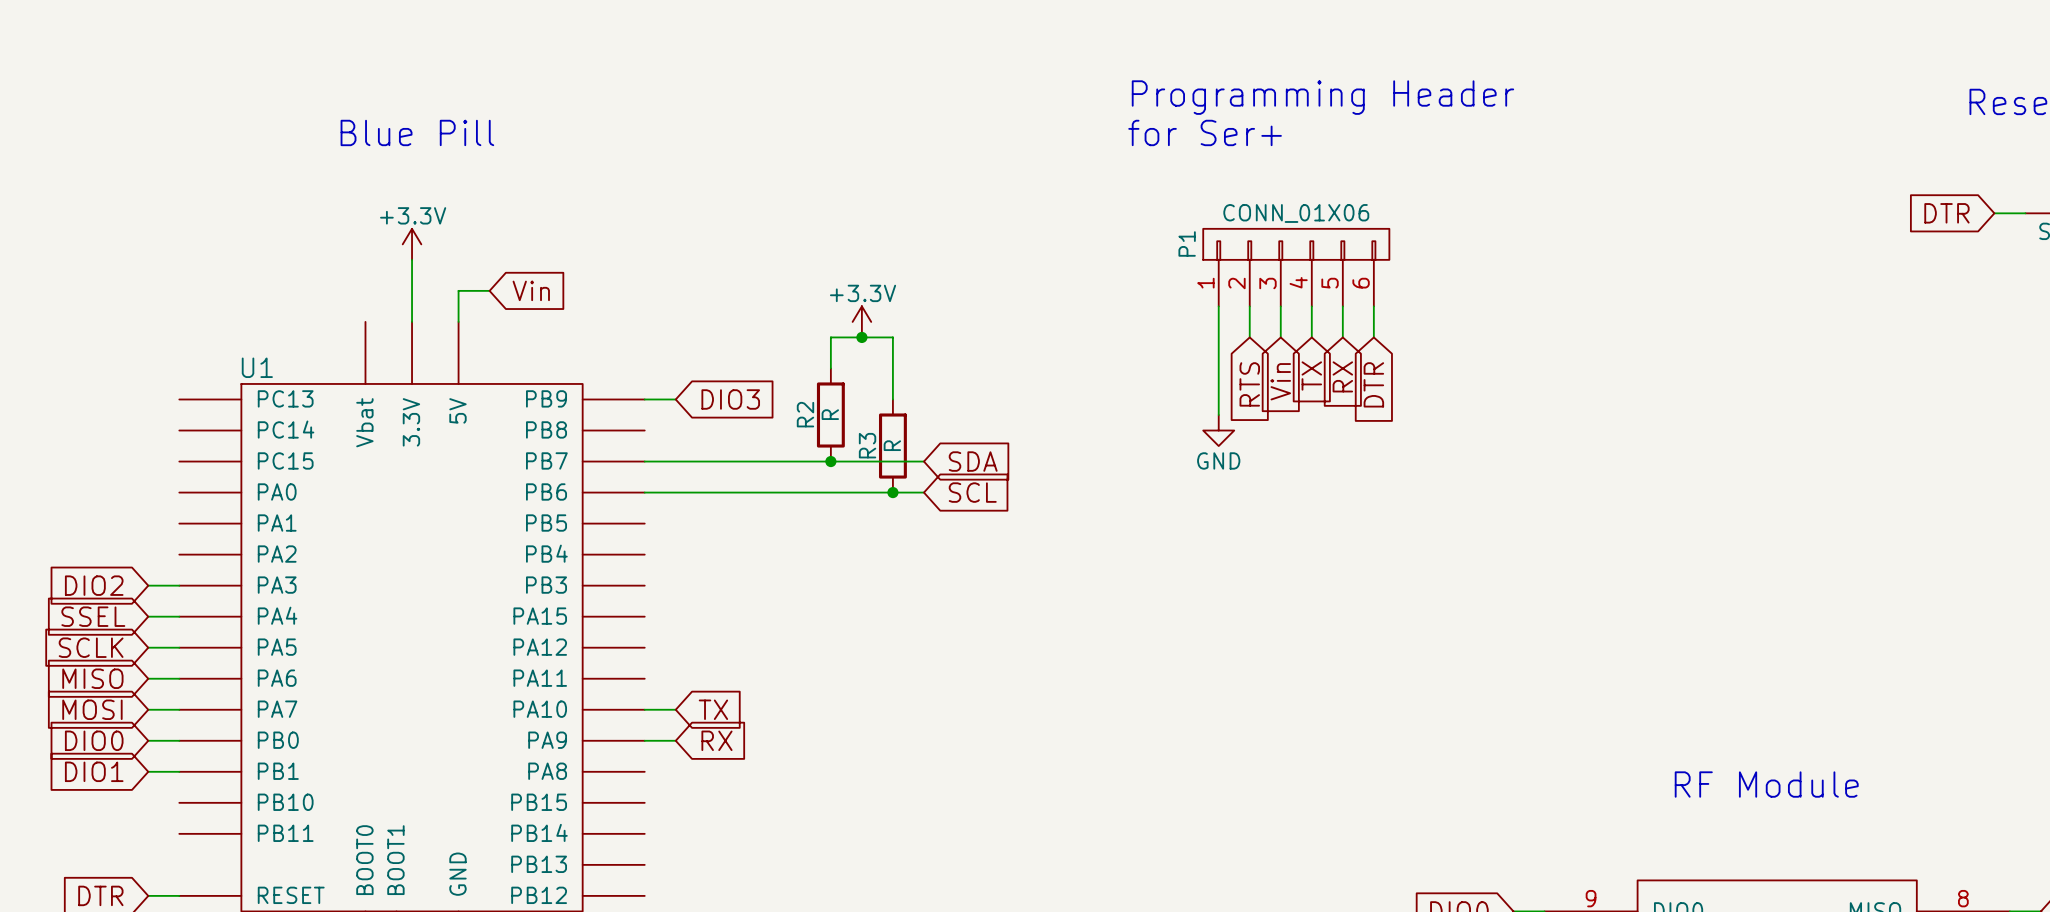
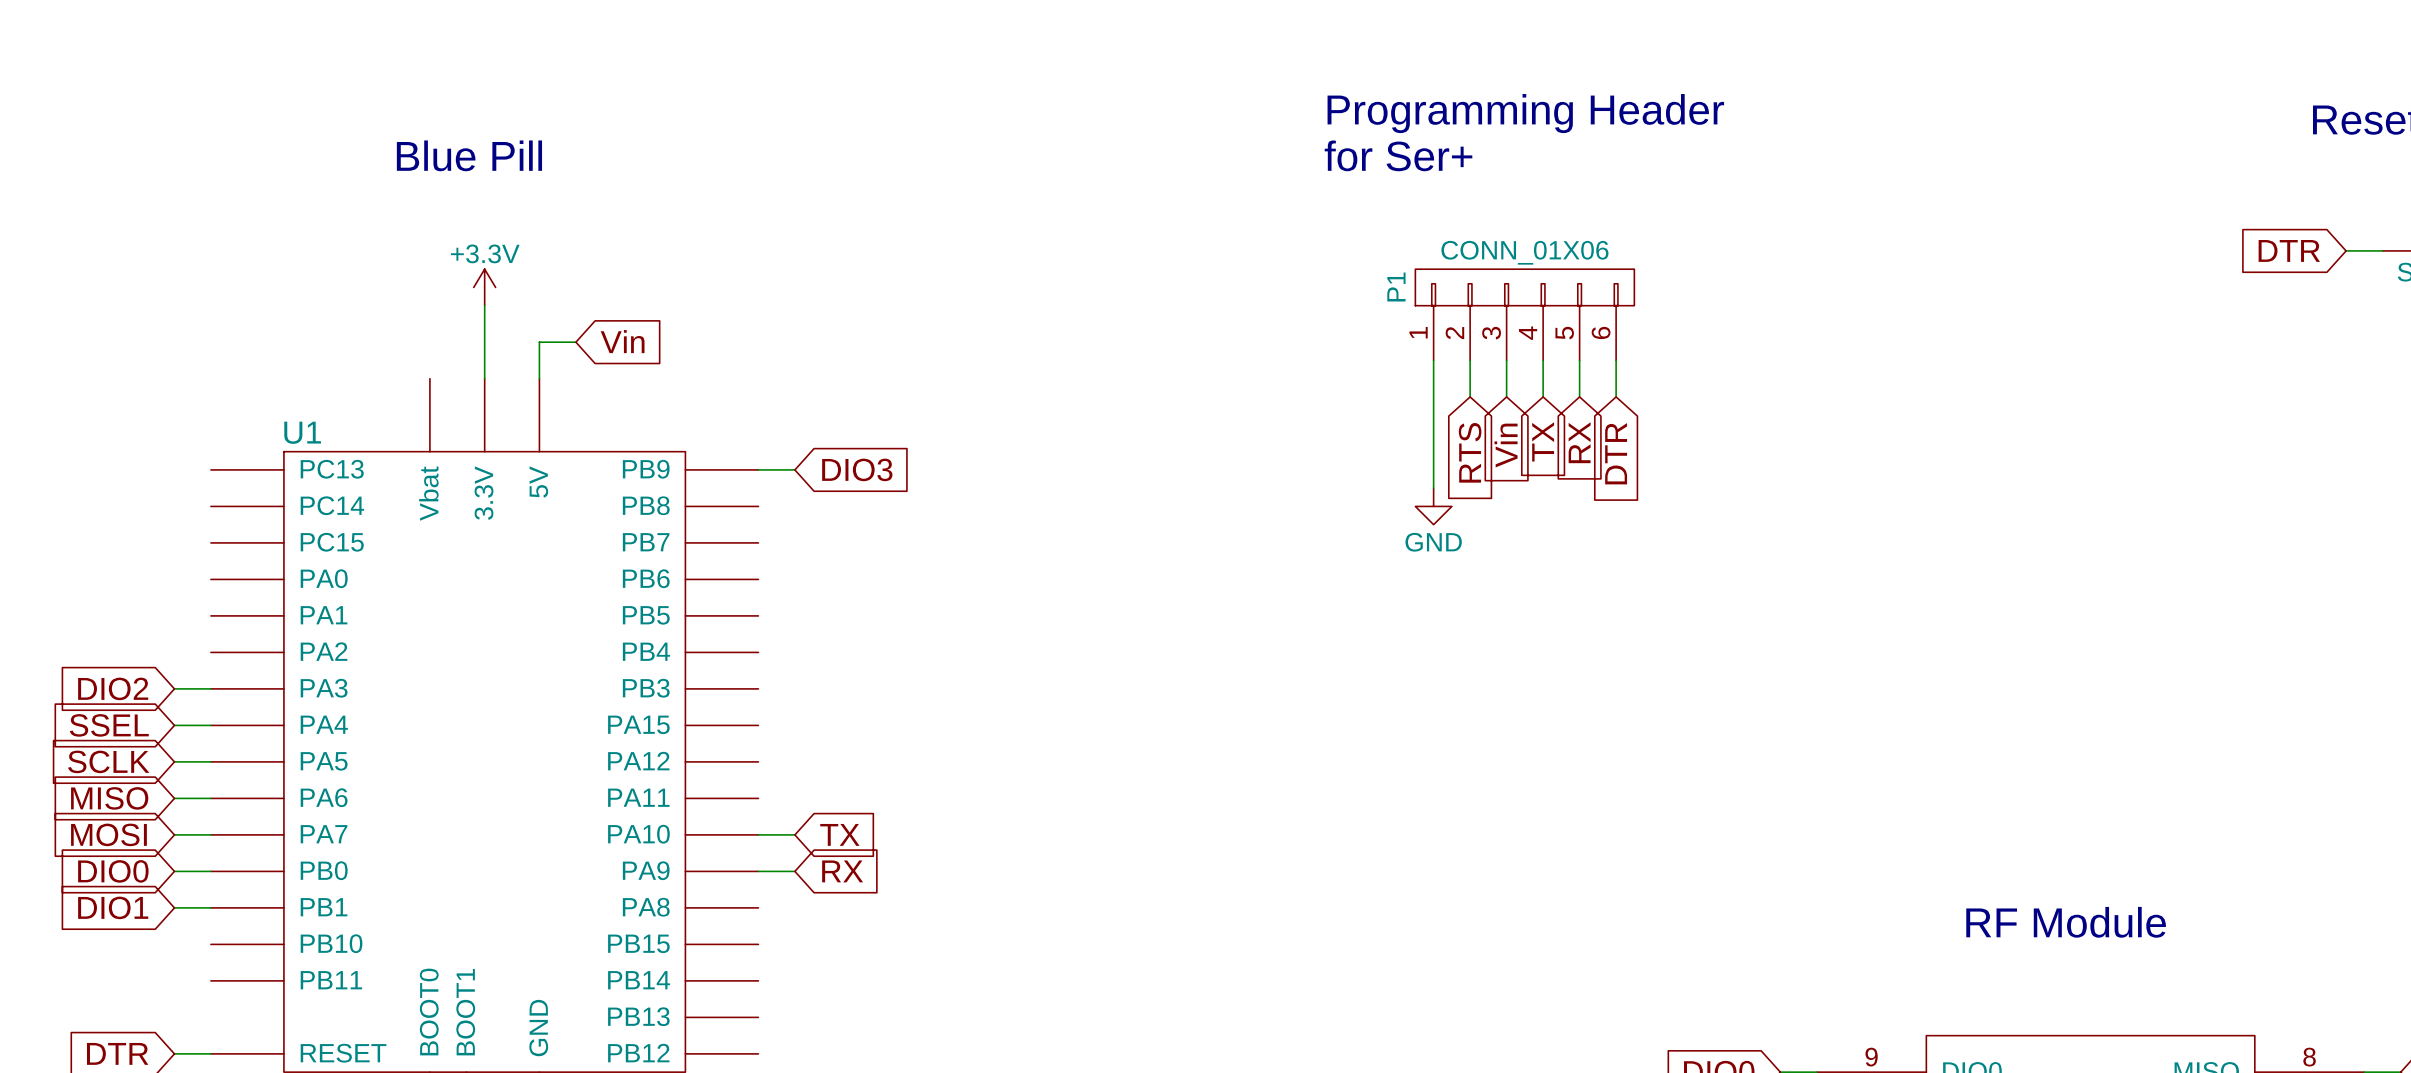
power symbol: +3.3V (861, 321) -> none
junction: (861, 337) -> none
wire: (830, 368) (830, 337) (892, 337) (892, 399) -> none
R2: R (830, 415) -> none
R3: R (892, 446) -> none
wire: (644, 461) (923, 461) -> none
junction: (830, 461) -> none
global label: SDA (973, 461) -> none
wire: (644, 492) (923, 492) -> none
junction: (892, 492) -> none
global label: SCL (972, 492) -> none

